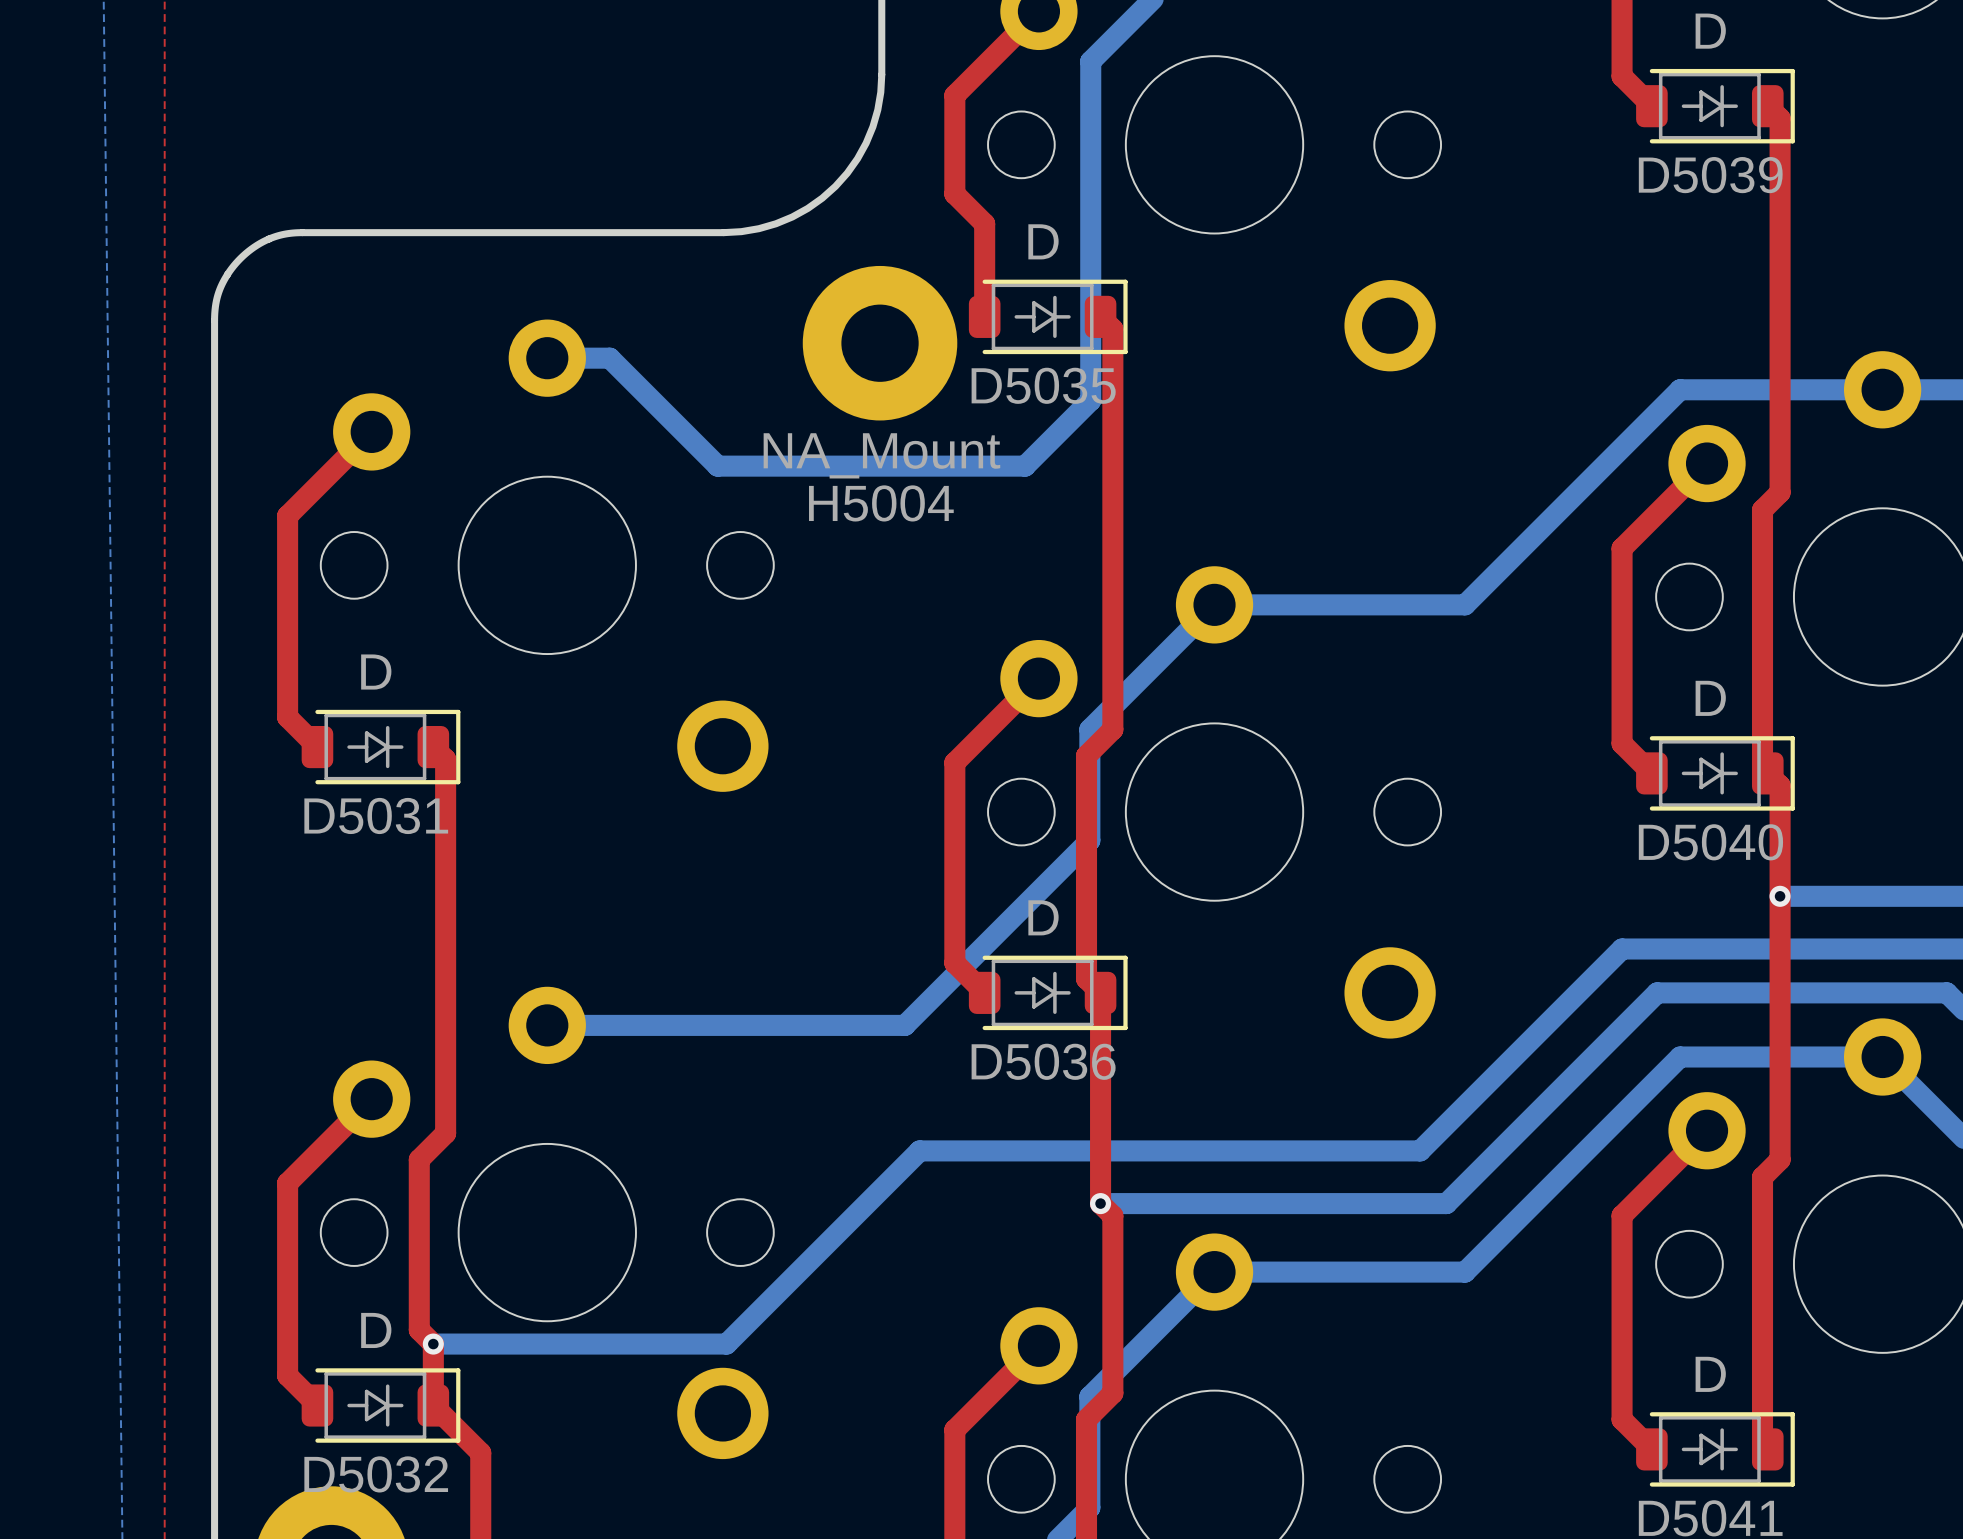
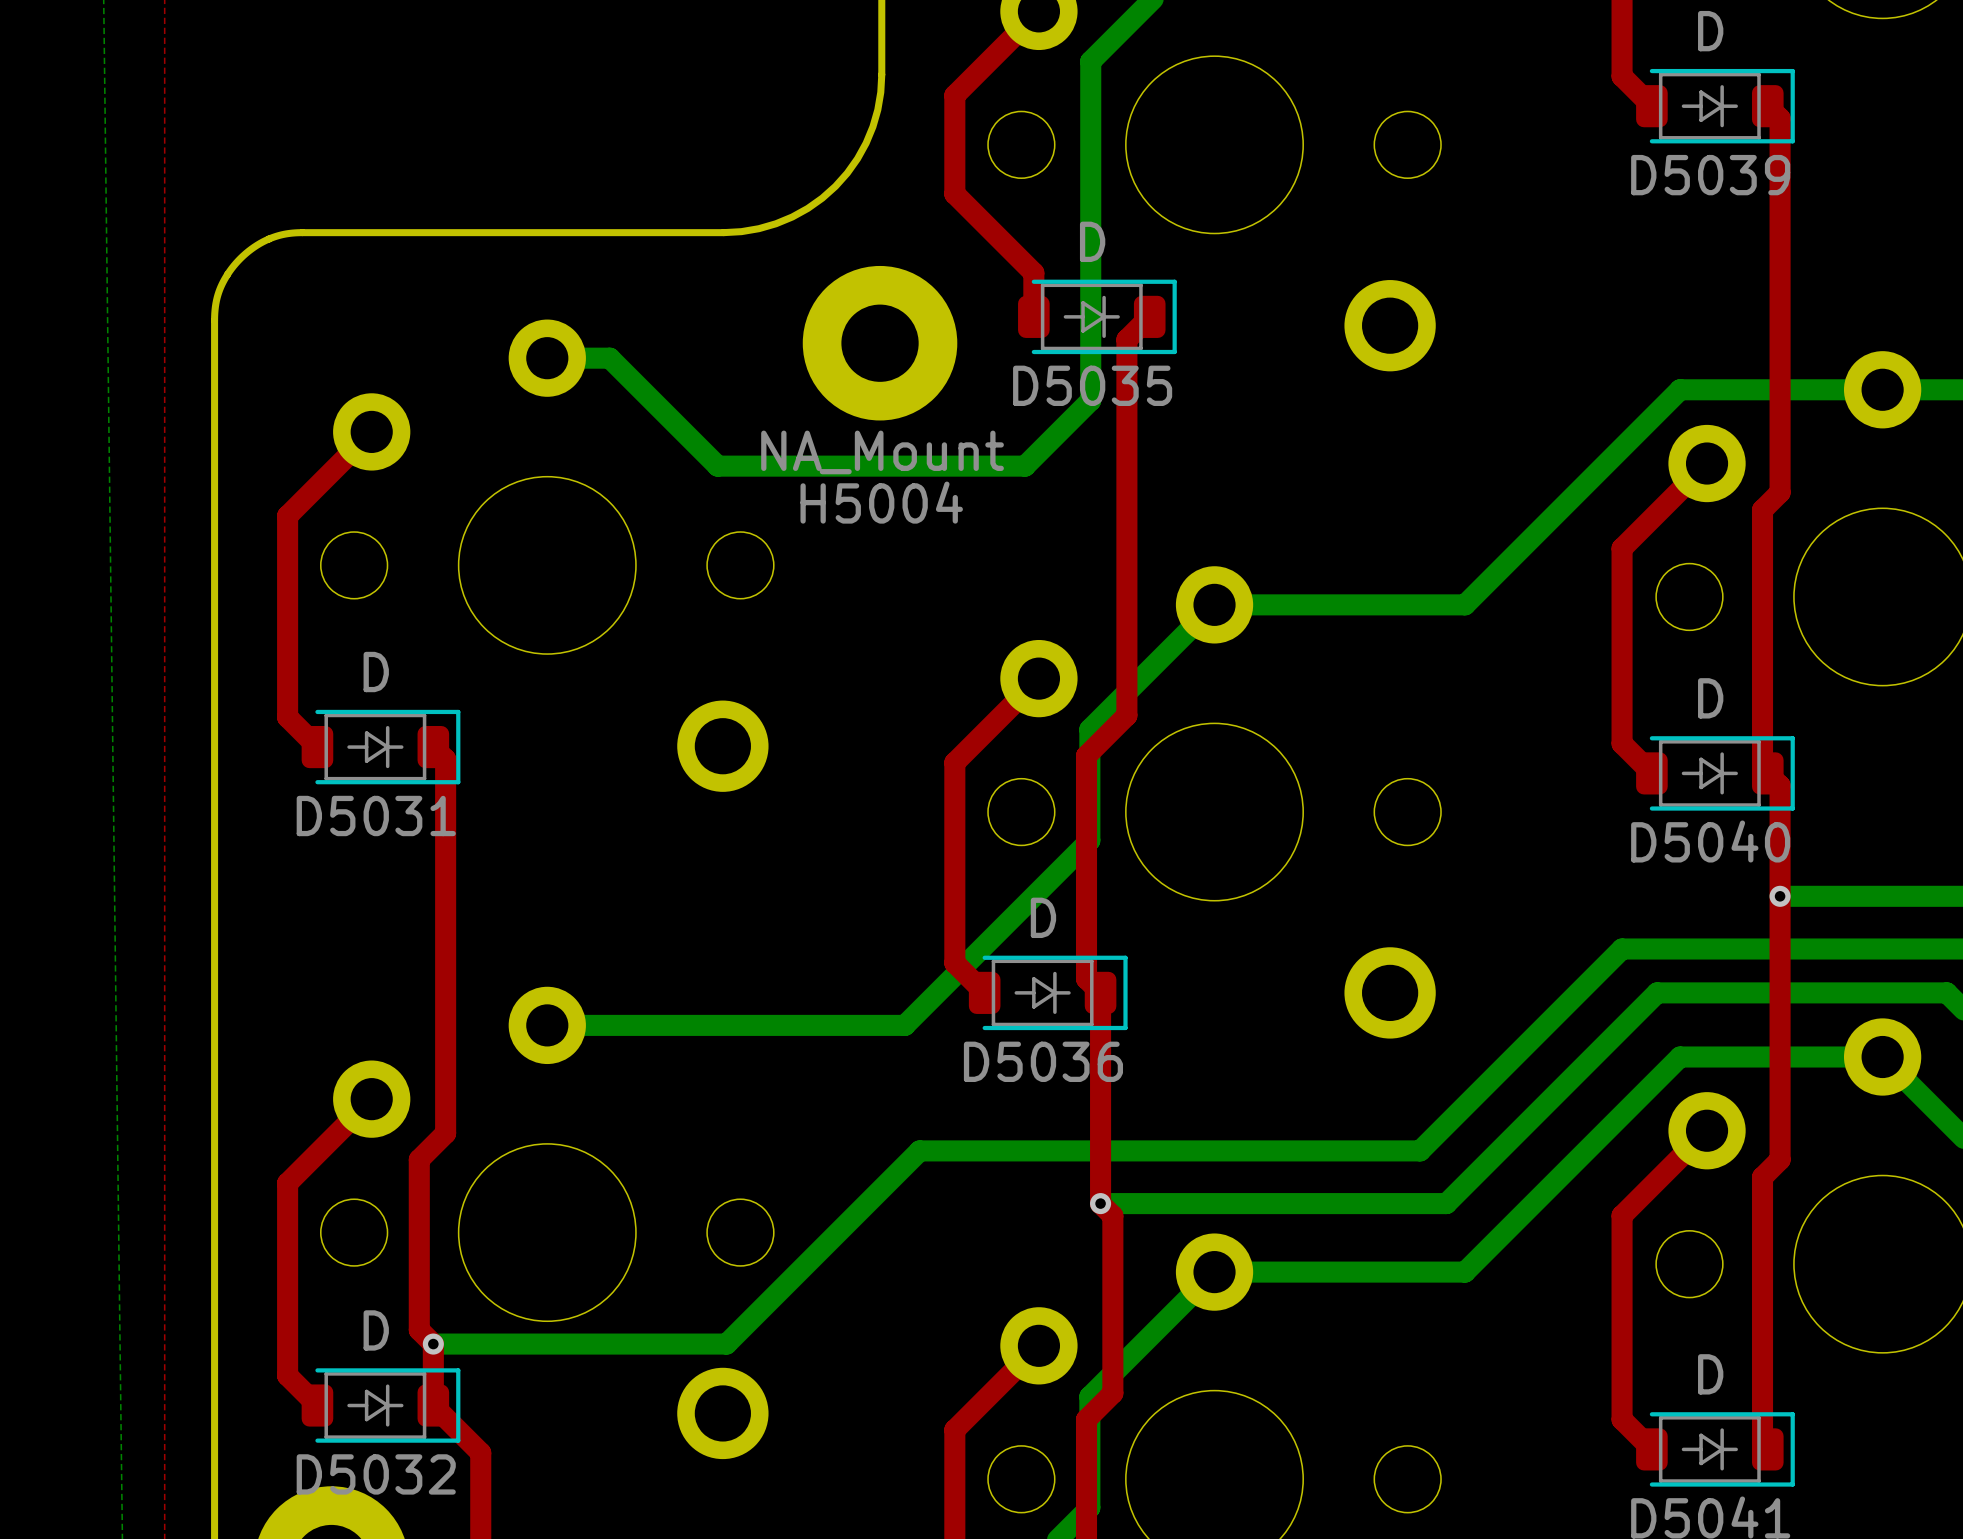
top track: (984, 223) (984, 316) -> (984, 223) (1033, 272) (1033, 316)
D5035 position: (1048, 316) -> (1097, 316)
top track: (1100, 316) (1112, 329) (1112, 729) -> (1149, 316) (1126, 339) (1126, 715) (1112, 729)

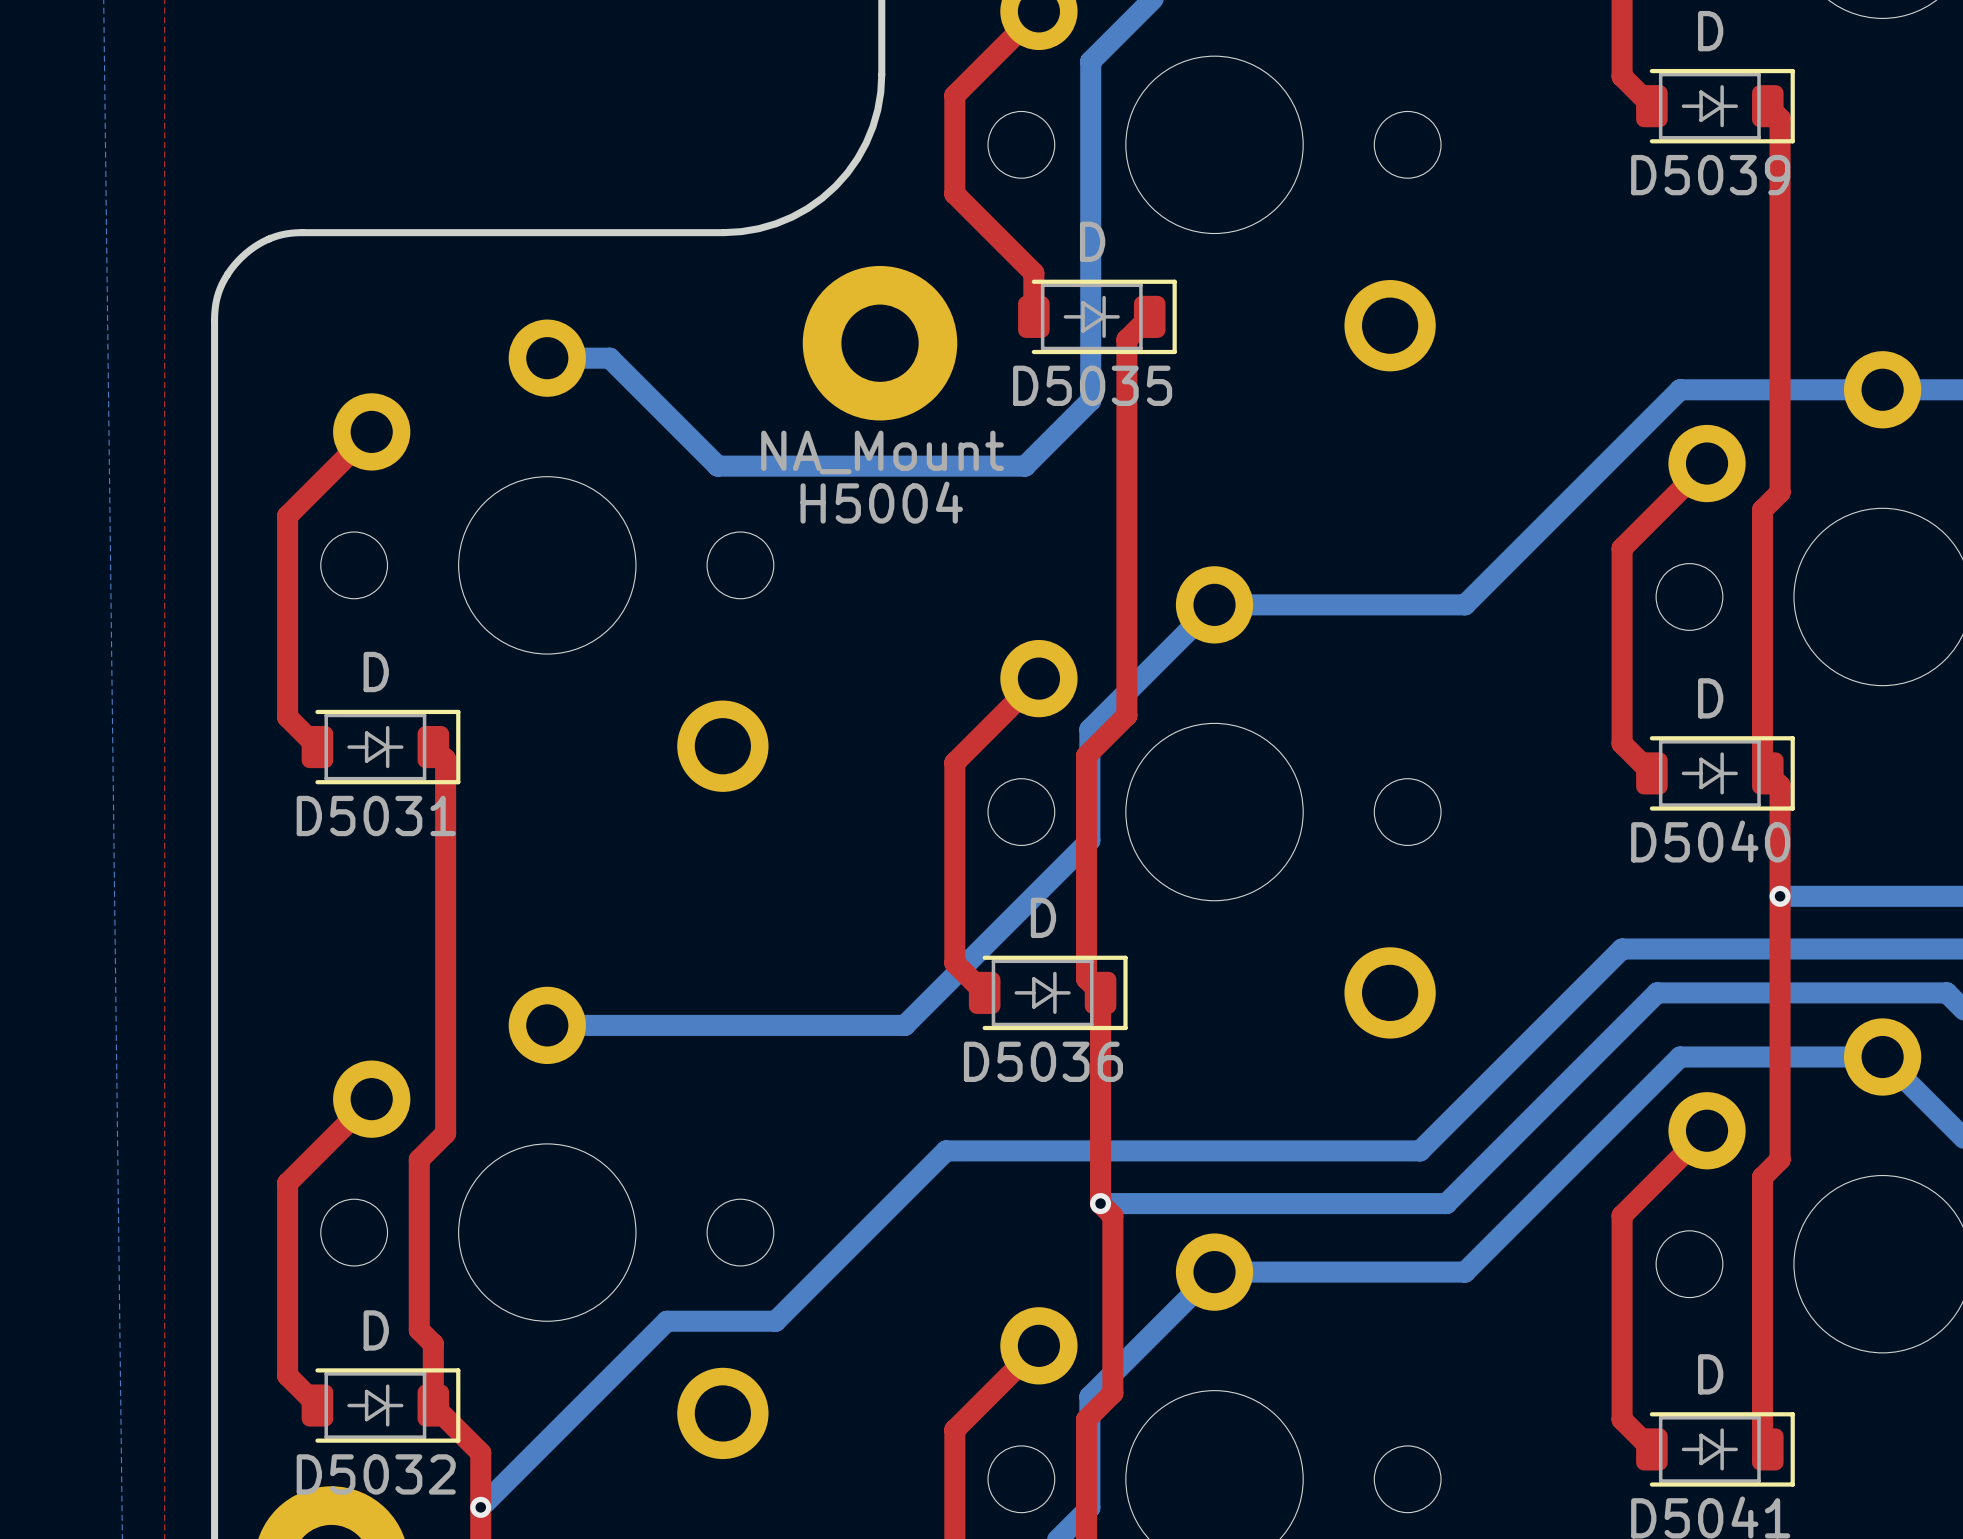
bottom track: (946, 1150) (919, 1150) (726, 1344) (433, 1344) -> (946, 1150) (775, 1321) (666, 1321) (480, 1507)
via position: (433, 1344) -> (480, 1507)

